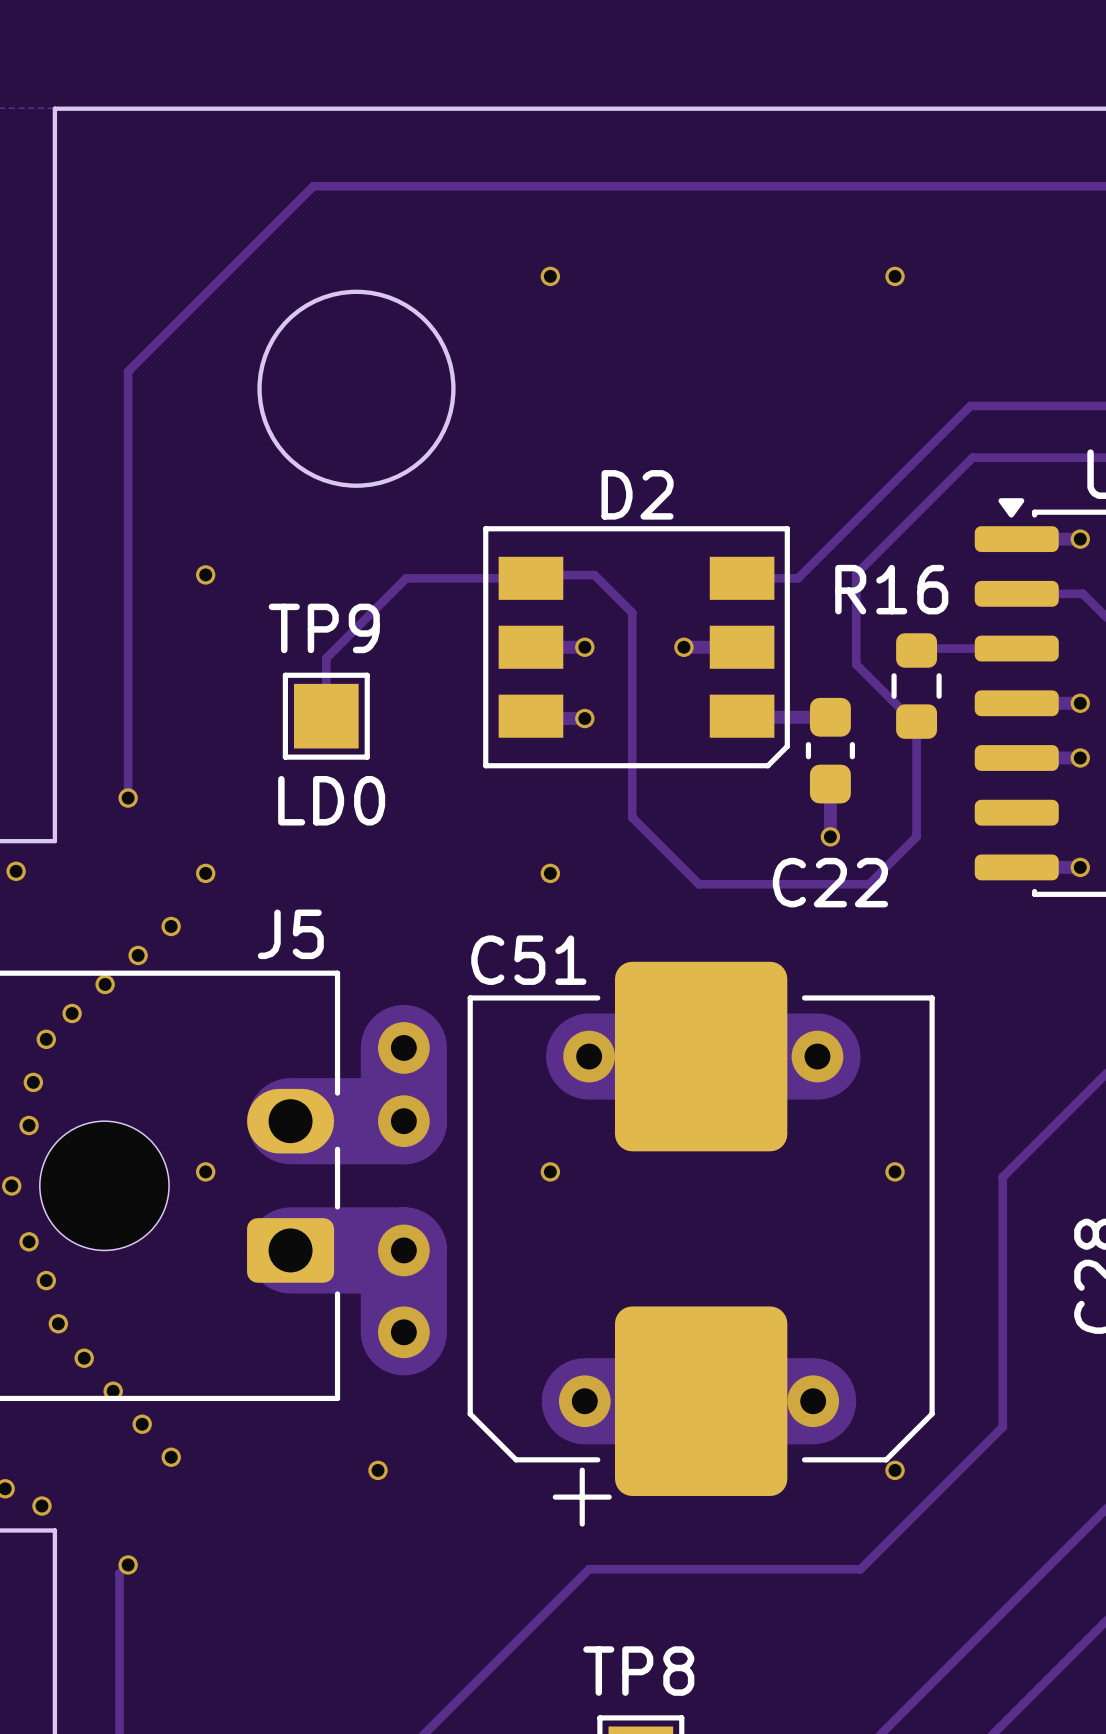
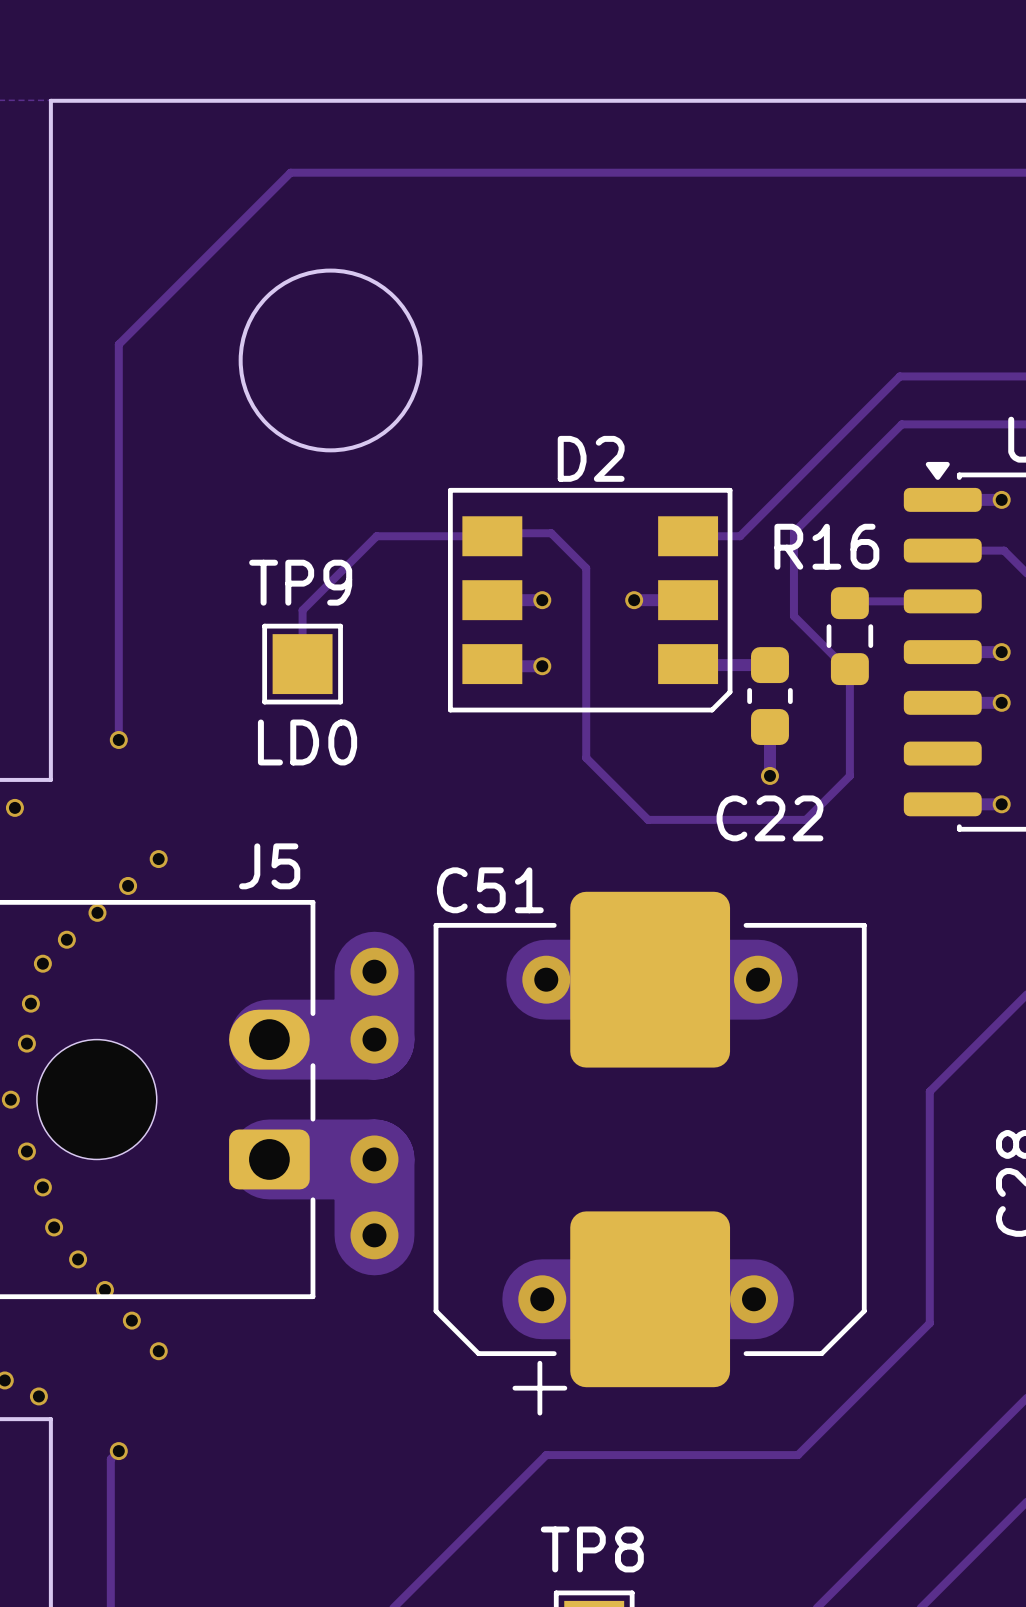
via: (550, 276) -> none
via: (895, 276) -> none
via: (205, 574) -> none
via: (205, 873) -> none
via: (550, 873) -> none
via: (205, 1171) -> none
via: (550, 1171) -> none
via: (895, 1171) -> none
via: (378, 1470) -> none
via: (895, 1470) -> none

